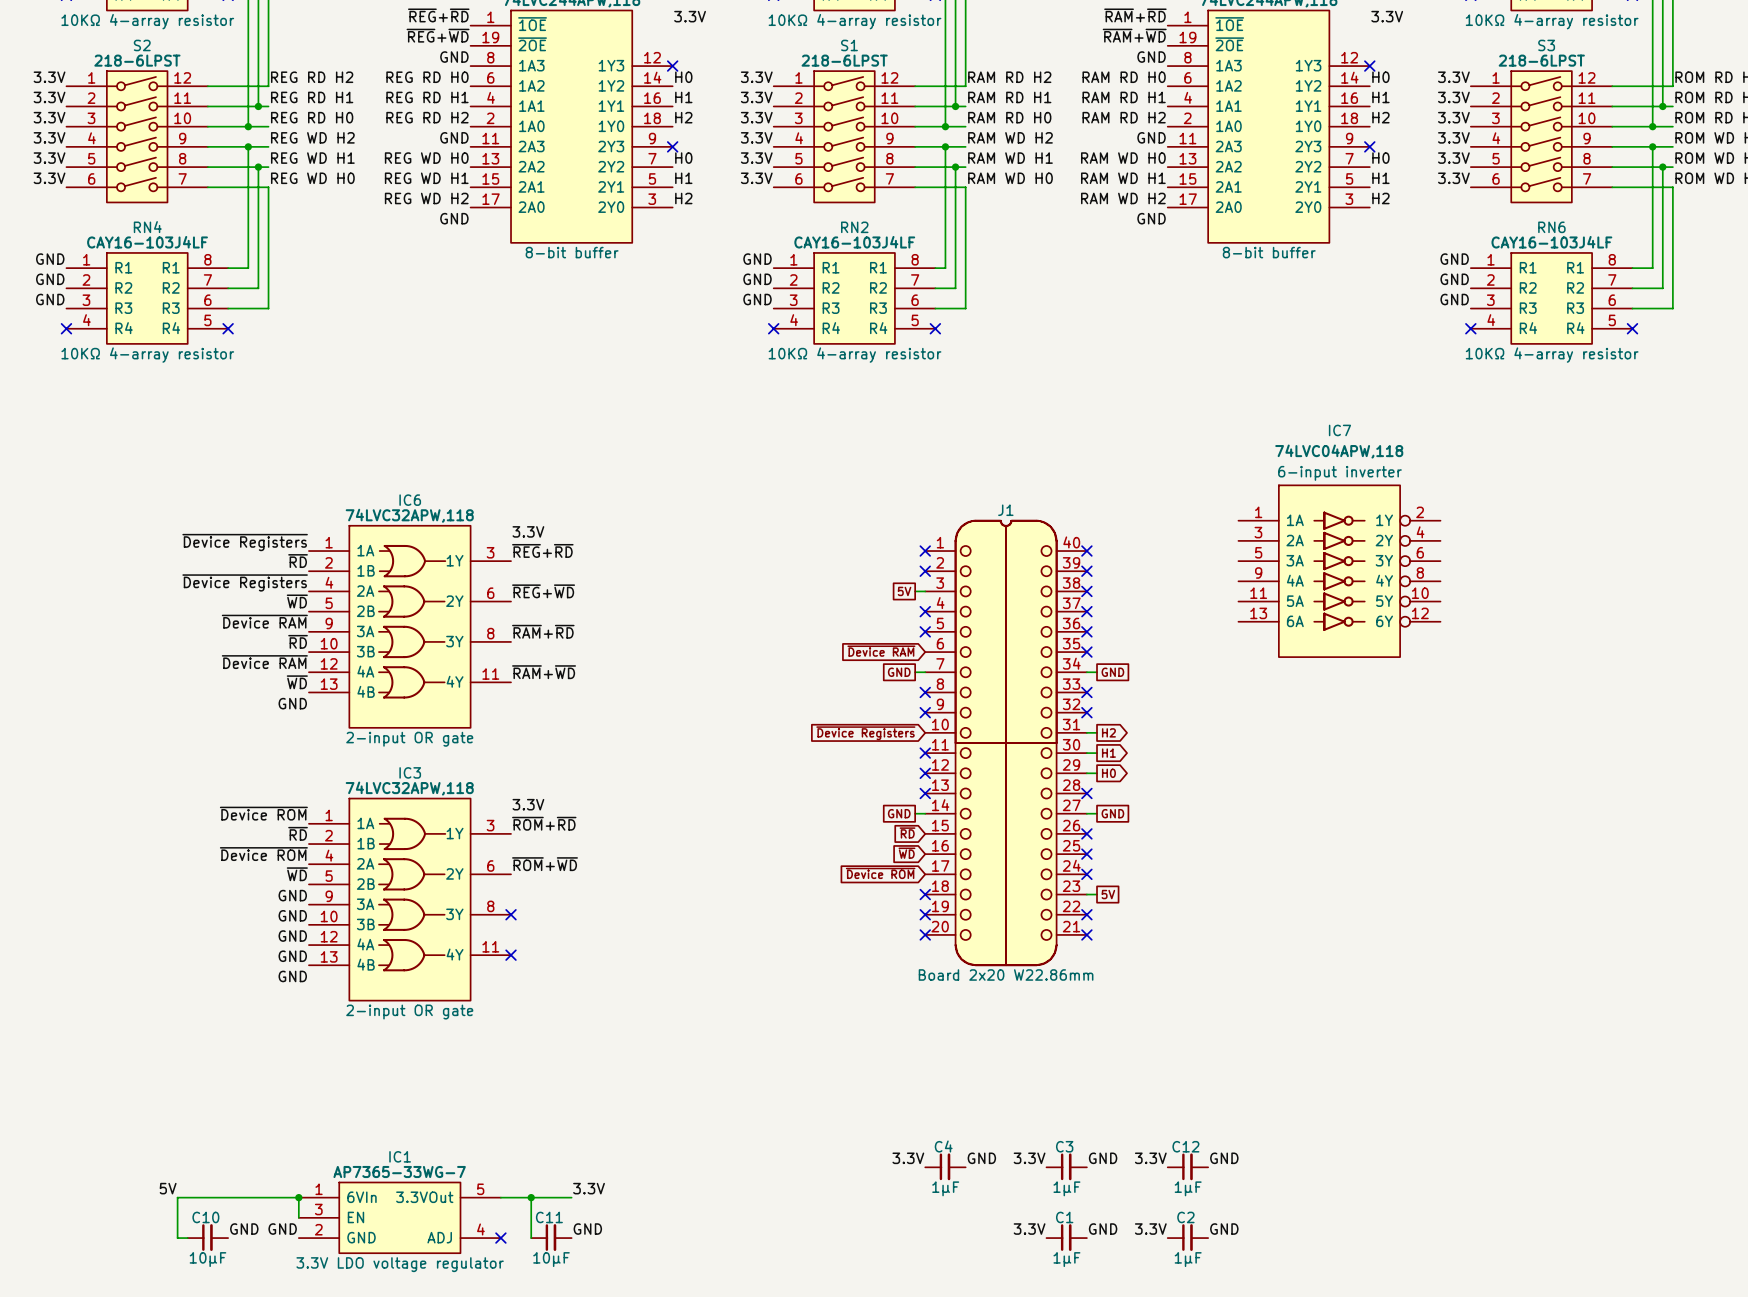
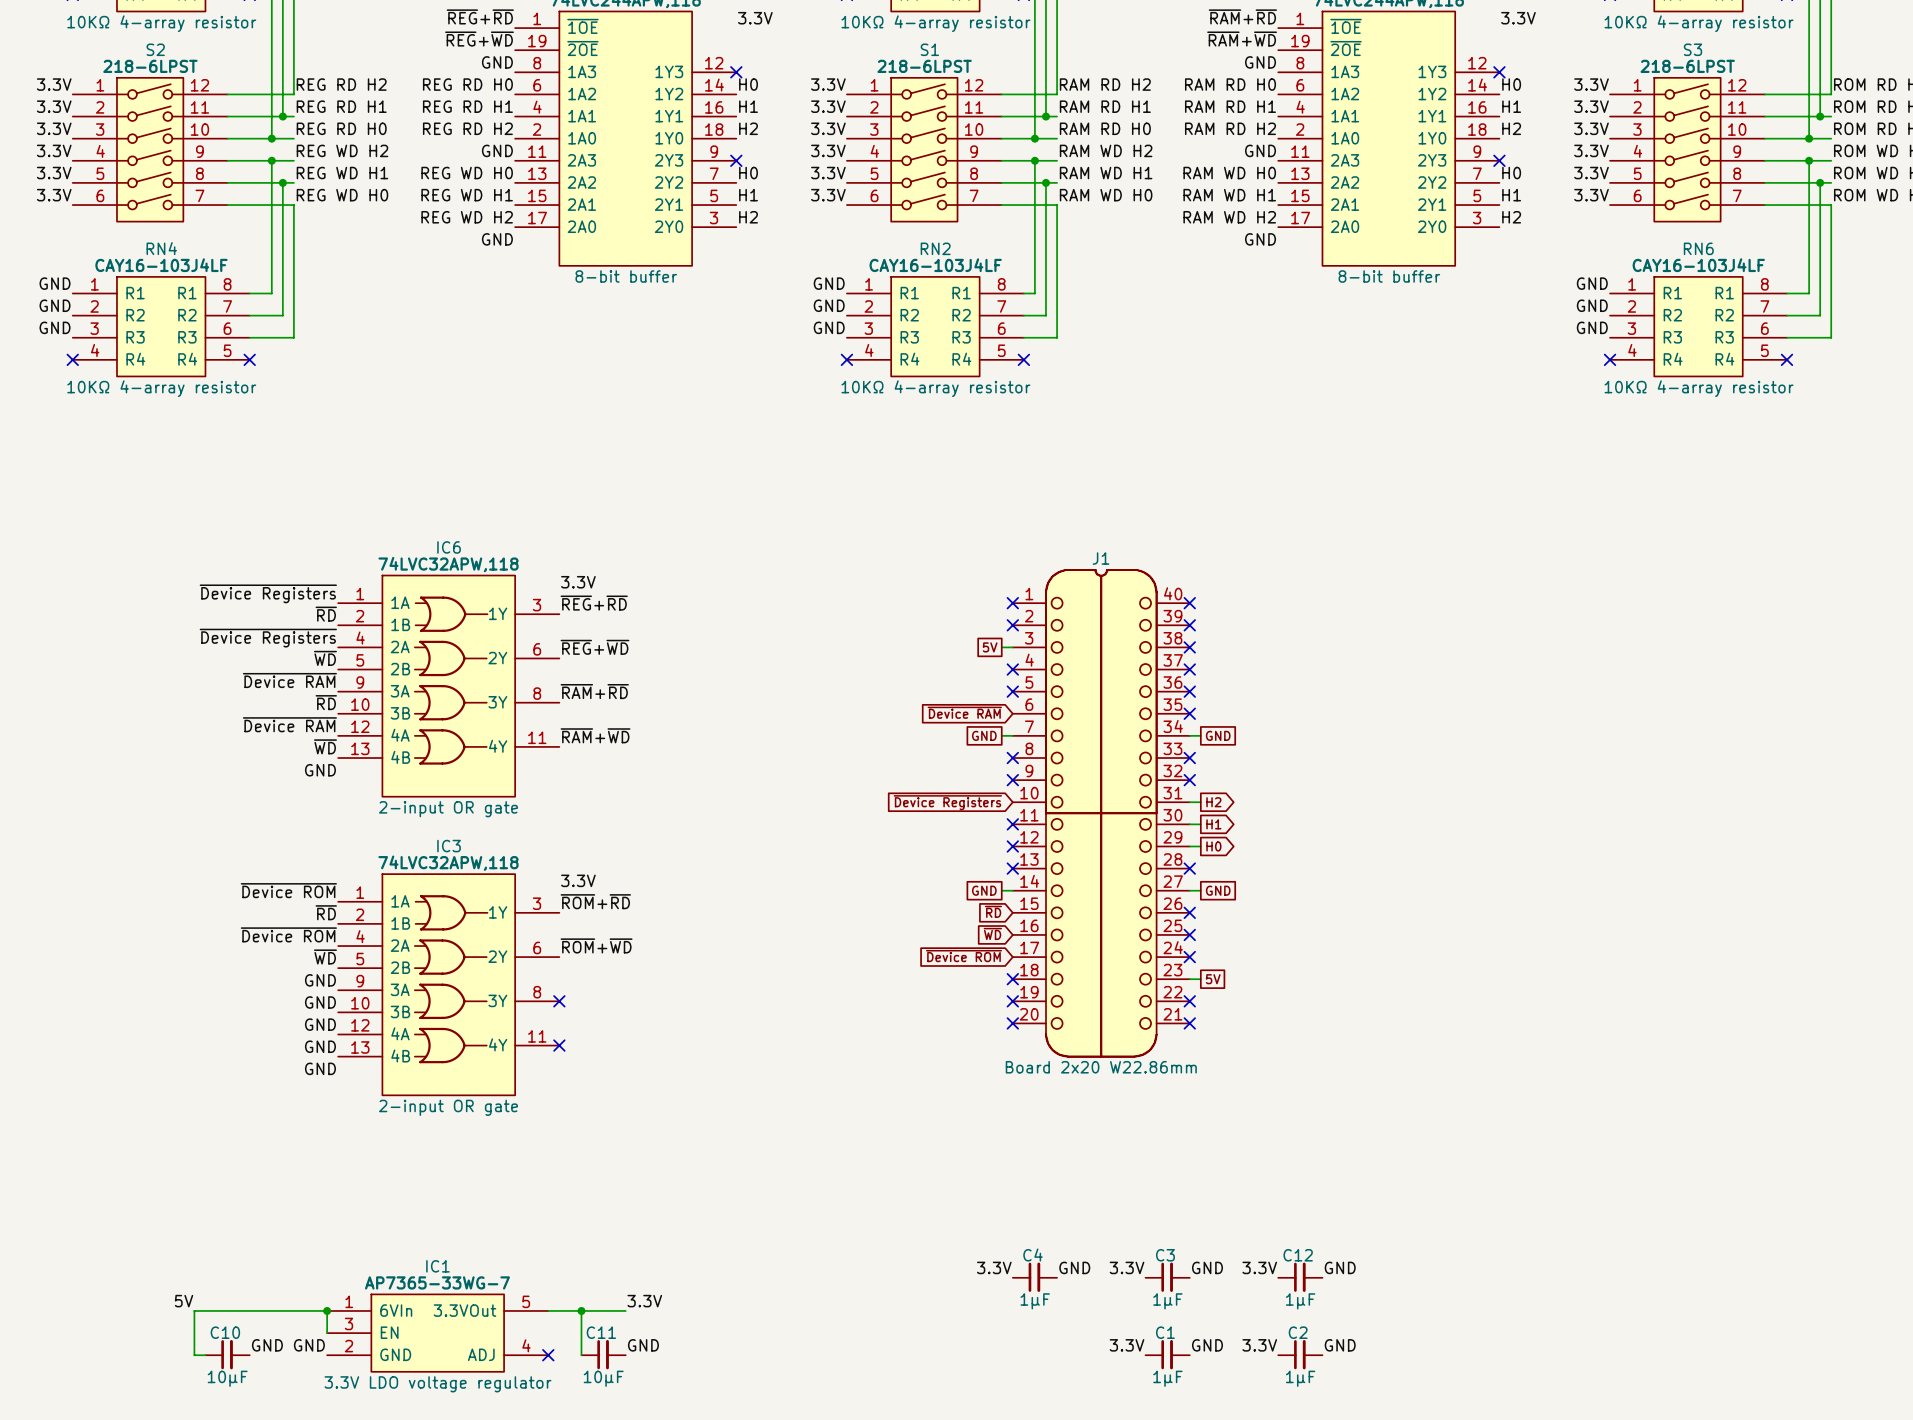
IC7: 74LVC04APW,118 (1339, 571) -> none

